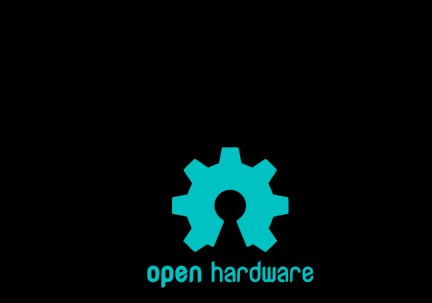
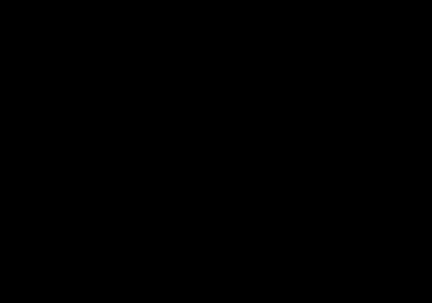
drawing: [147, 147, 314, 288] -> none

